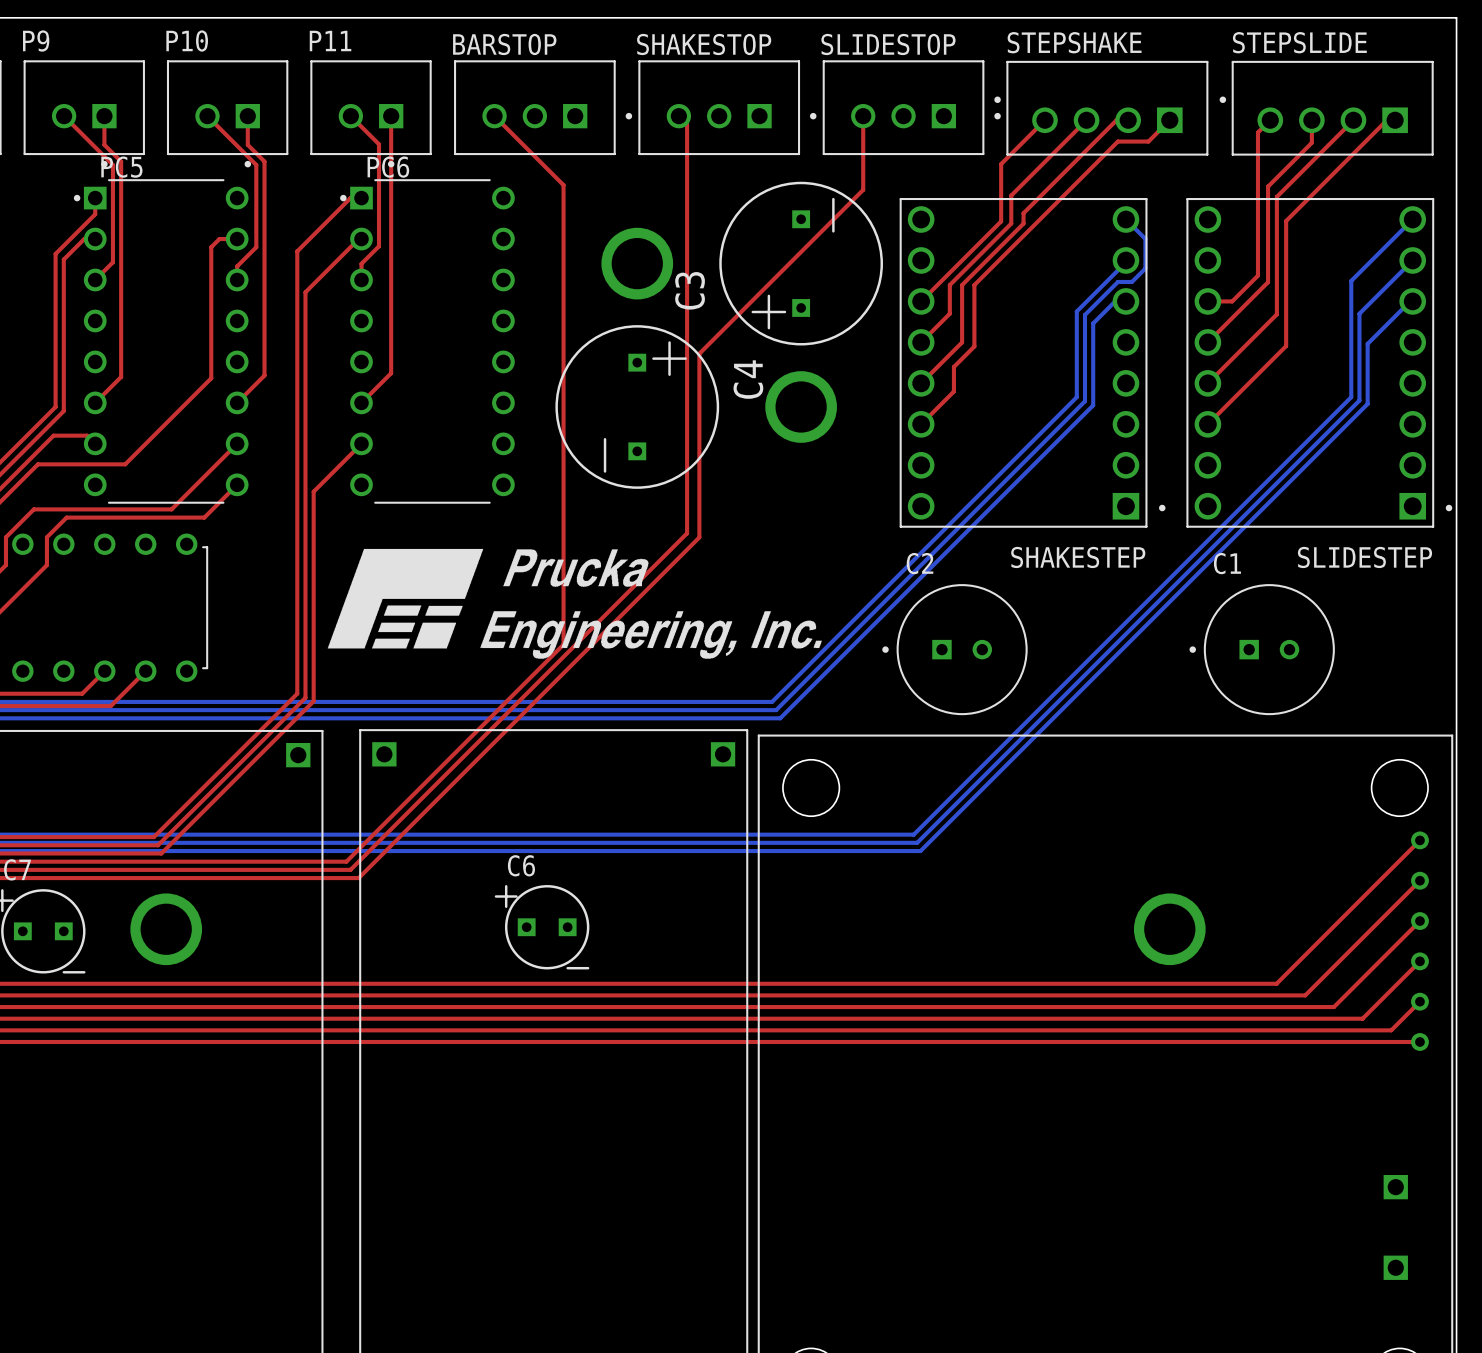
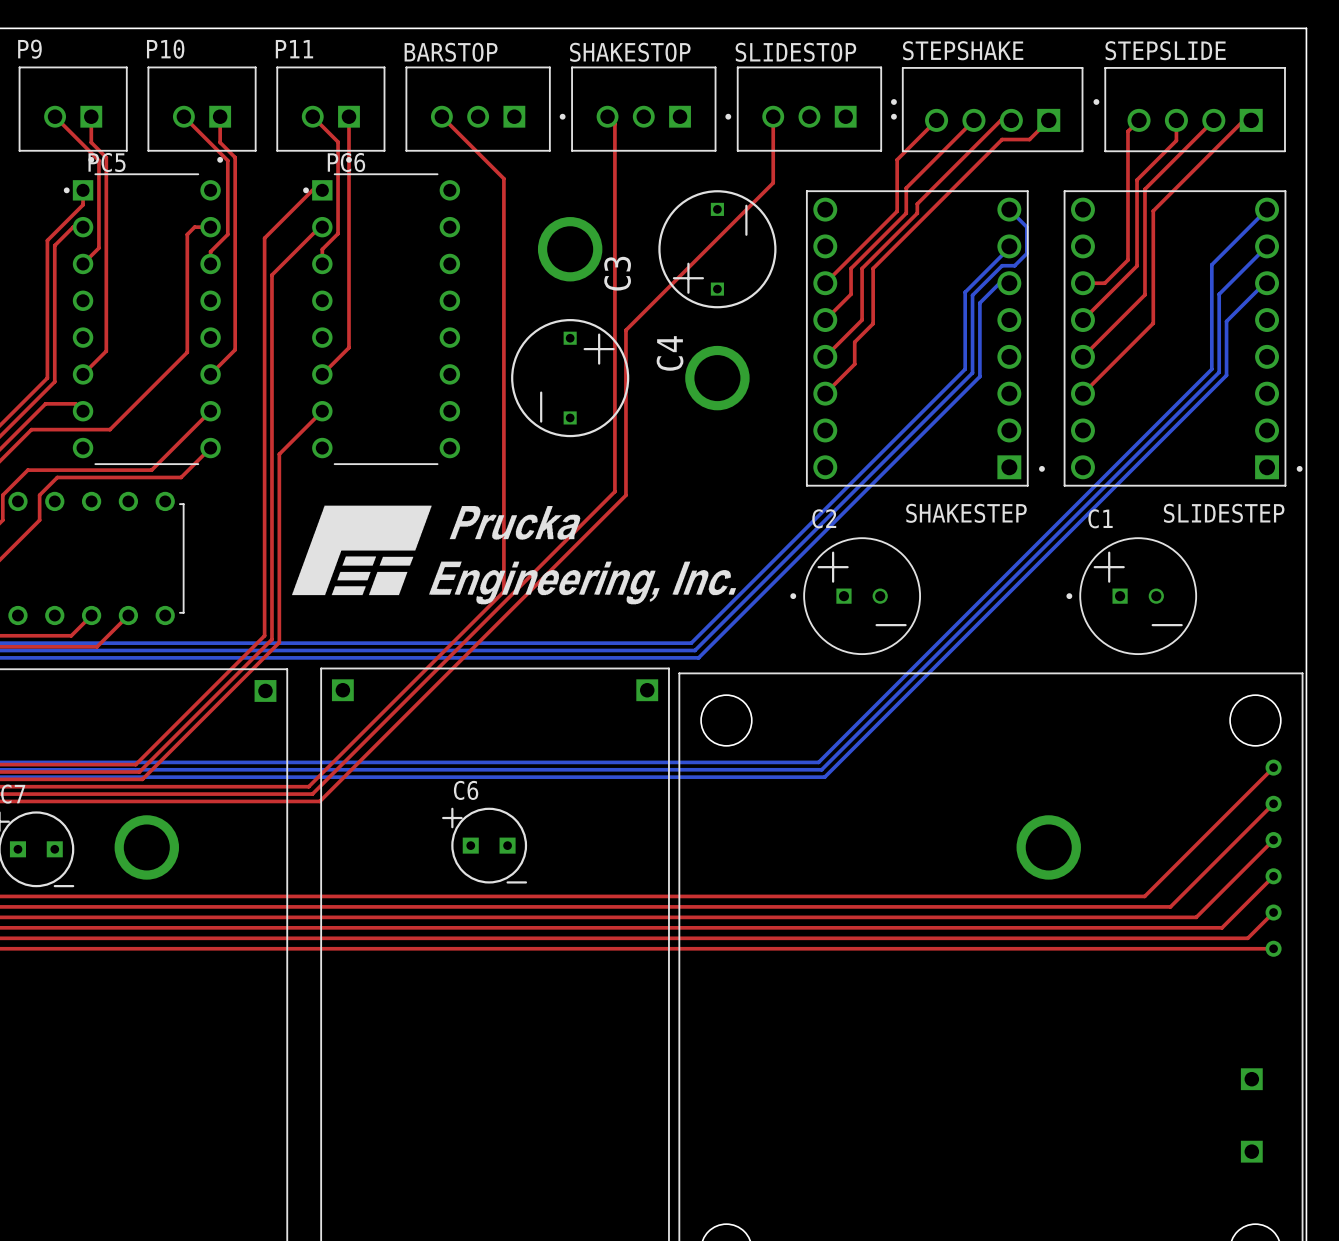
C3 footprint: [719, 181, 884, 346] -> [658, 190, 777, 309]
C4 footprint: [555, 325, 720, 489] -> [511, 319, 630, 438]
C2 footprint: [882, 584, 1028, 716] -> [790, 537, 921, 656]
C1 footprint: [1189, 584, 1335, 716] -> [1066, 537, 1198, 656]

